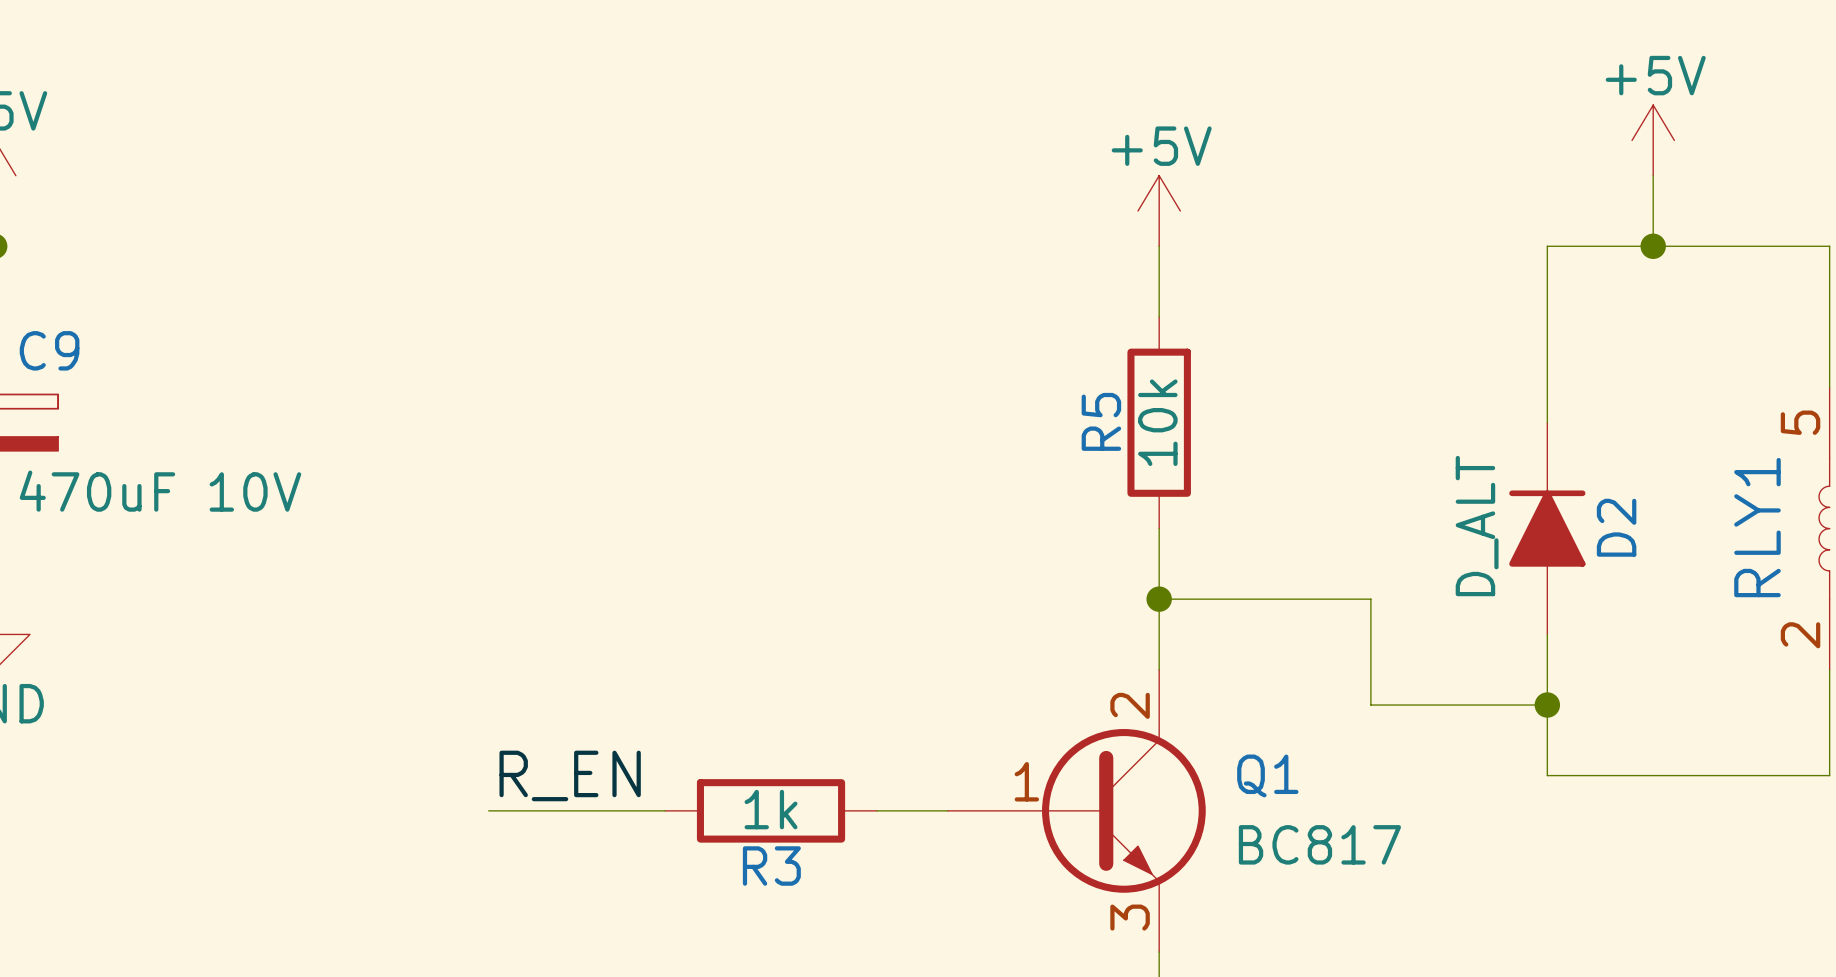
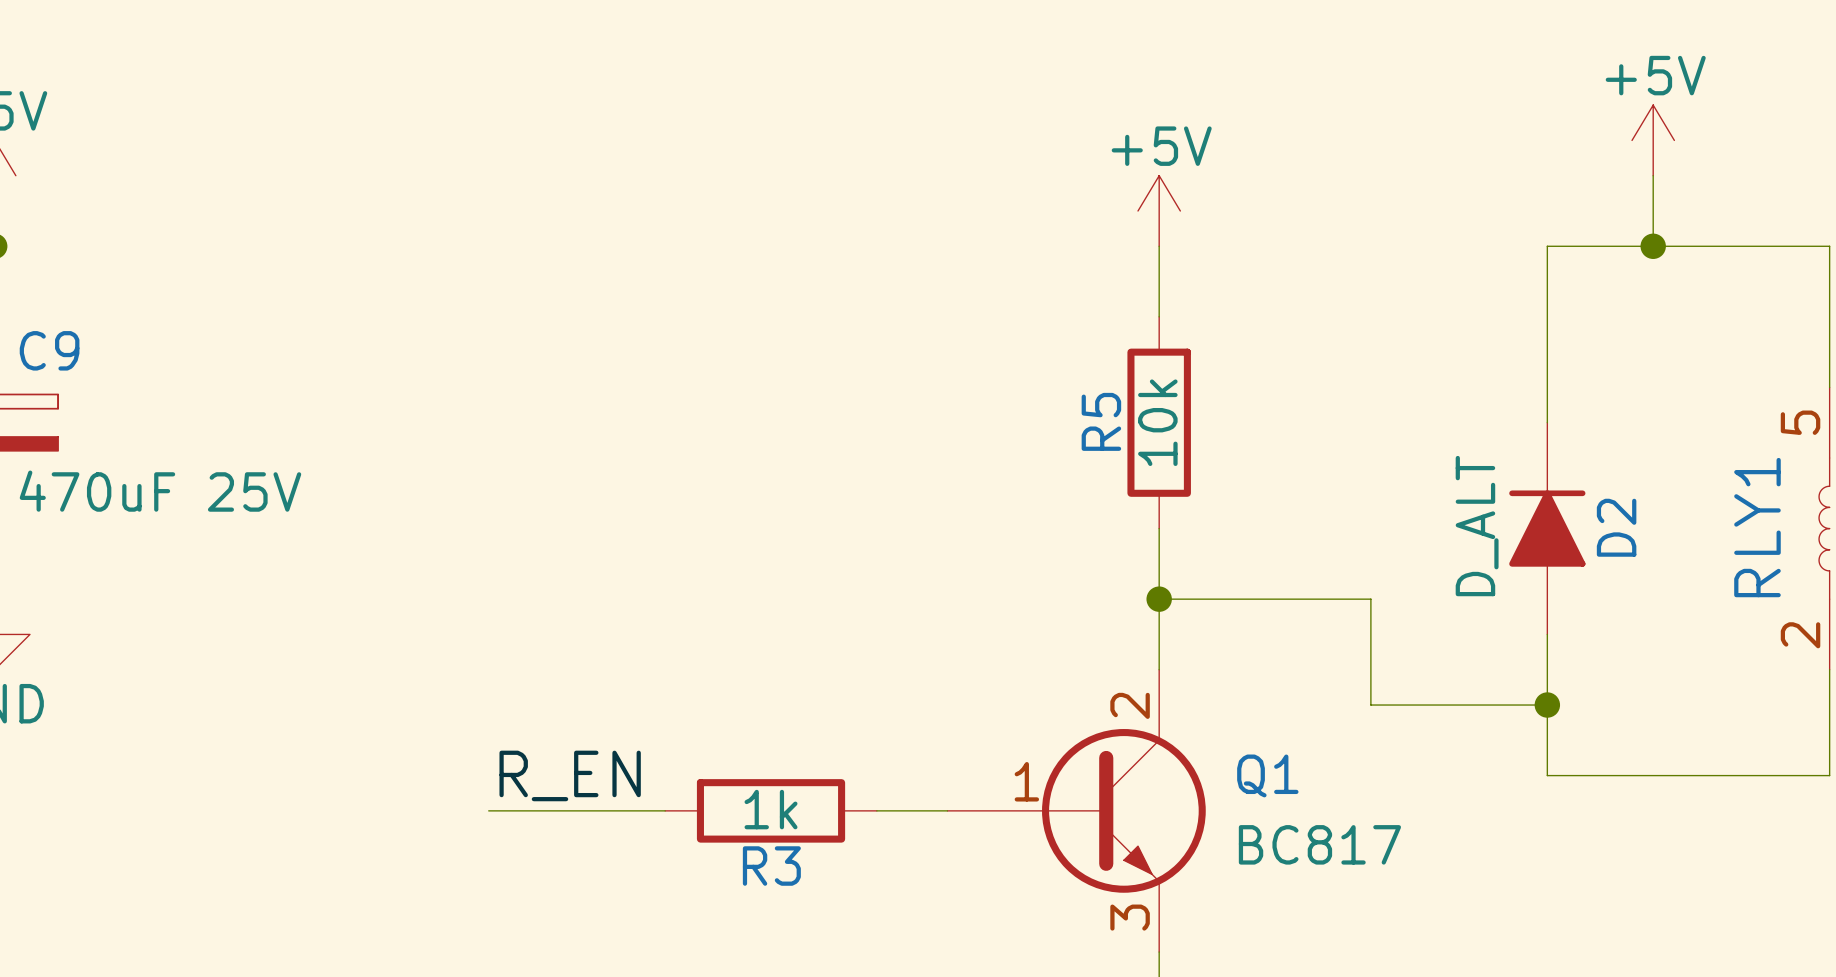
C9 value: 470uF 10V (160, 491) -> 470uF 25V (160, 491)

